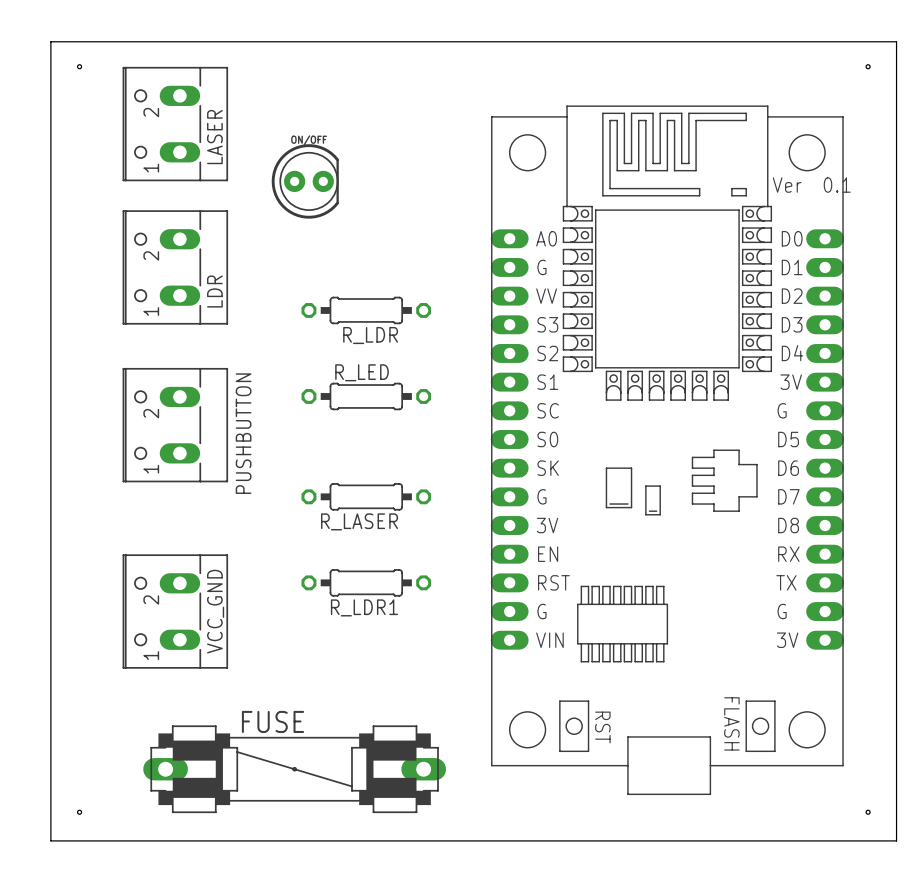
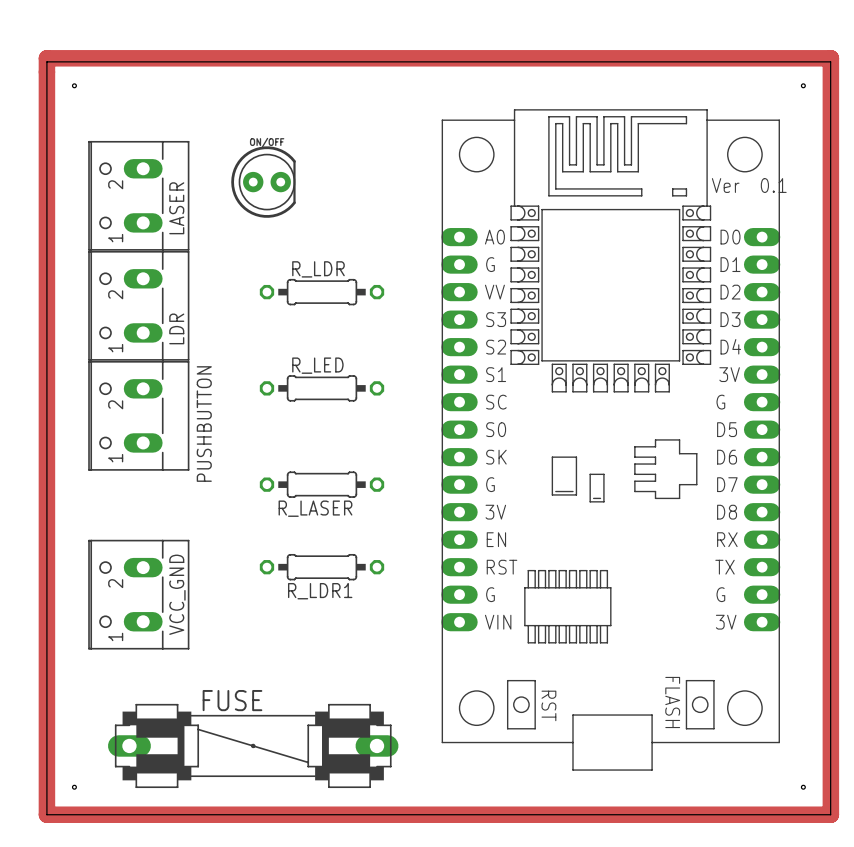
track: none -> (46, 58) (46, 814) (830, 814) (830, 58) (46, 58)
board edge: (896, 56) (896, 41) (50, 41) (50, 840) (79, 840) -> (830, 61) (46, 61) (46, 814)
hole position: (79, 66) -> (74, 85)
hole position: (868, 66) -> (803, 85)
LASER position: (175, 124) -> (138, 195)
LDR position: (175, 267) -> (138, 305)
R_LDR position: (366, 310) -> (321, 292)
R_LDR name position: R_LDR (370, 335) -> R_LDR (318, 269)
hole position: (79, 812) -> (74, 787)

